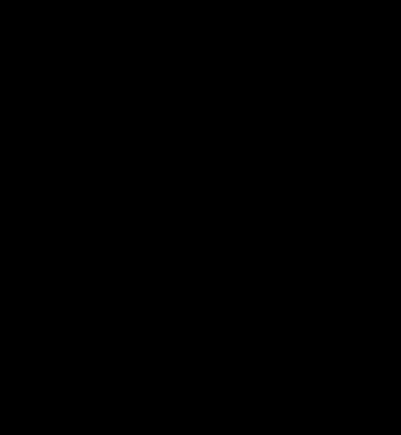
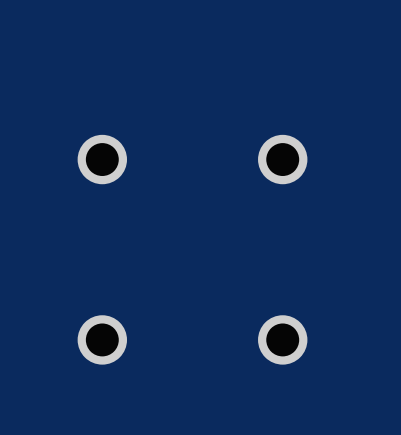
part: none -> (102, 159)
part: none -> (282, 159)
part: none -> (102, 339)
part: none -> (282, 339)

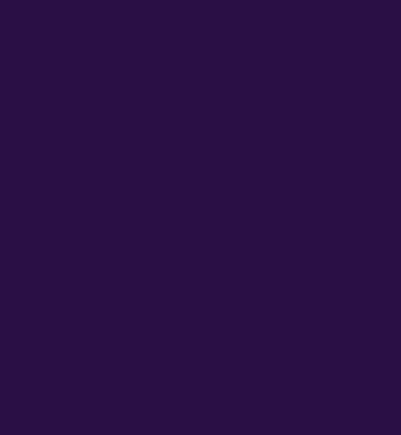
part: (102, 159) -> none
part: (282, 159) -> none
part: (102, 339) -> none
part: (282, 339) -> none

